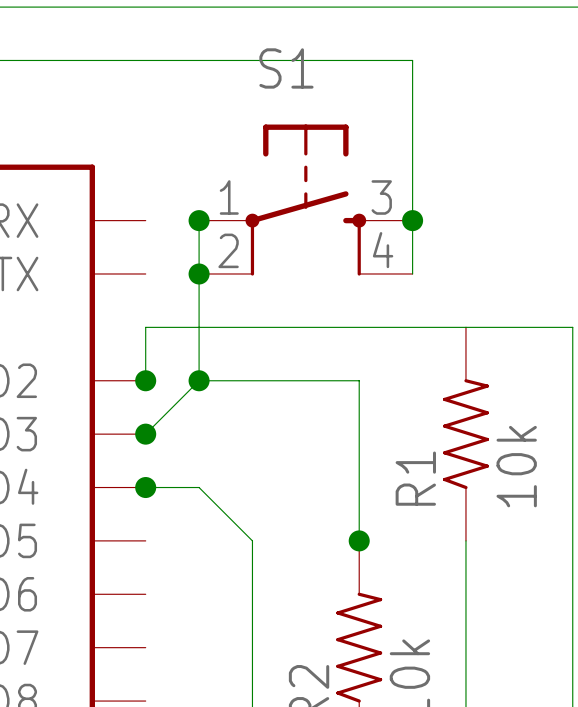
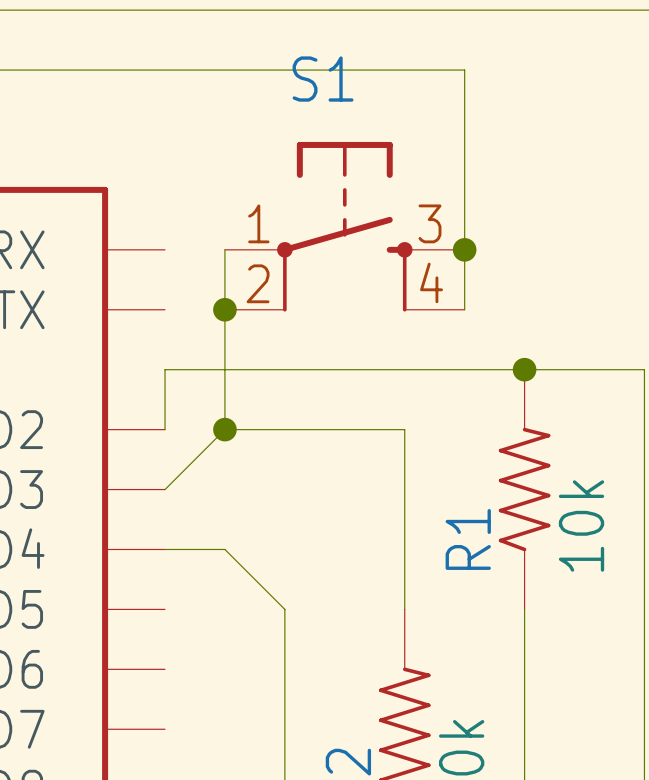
junction: (199, 220) -> none
junction: none -> (524, 369)
junction: (145, 380) -> none
junction: (145, 434) -> none
junction: (145, 487) -> none
junction: (359, 540) -> none

